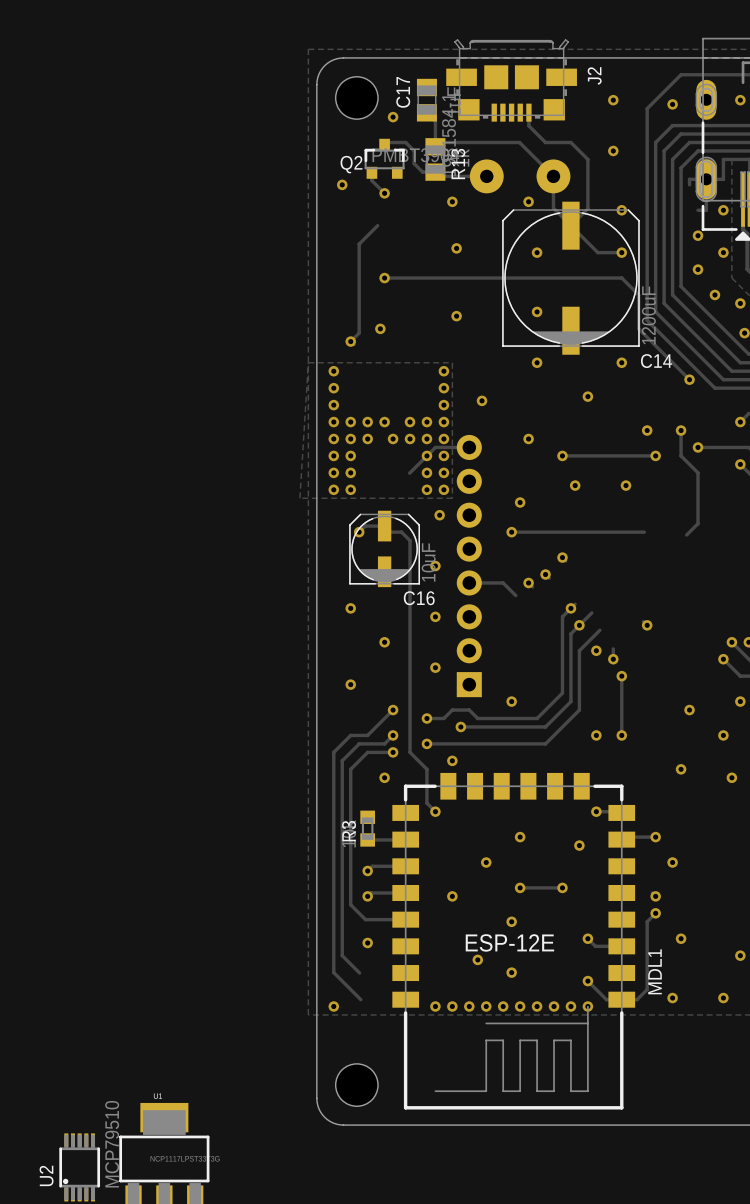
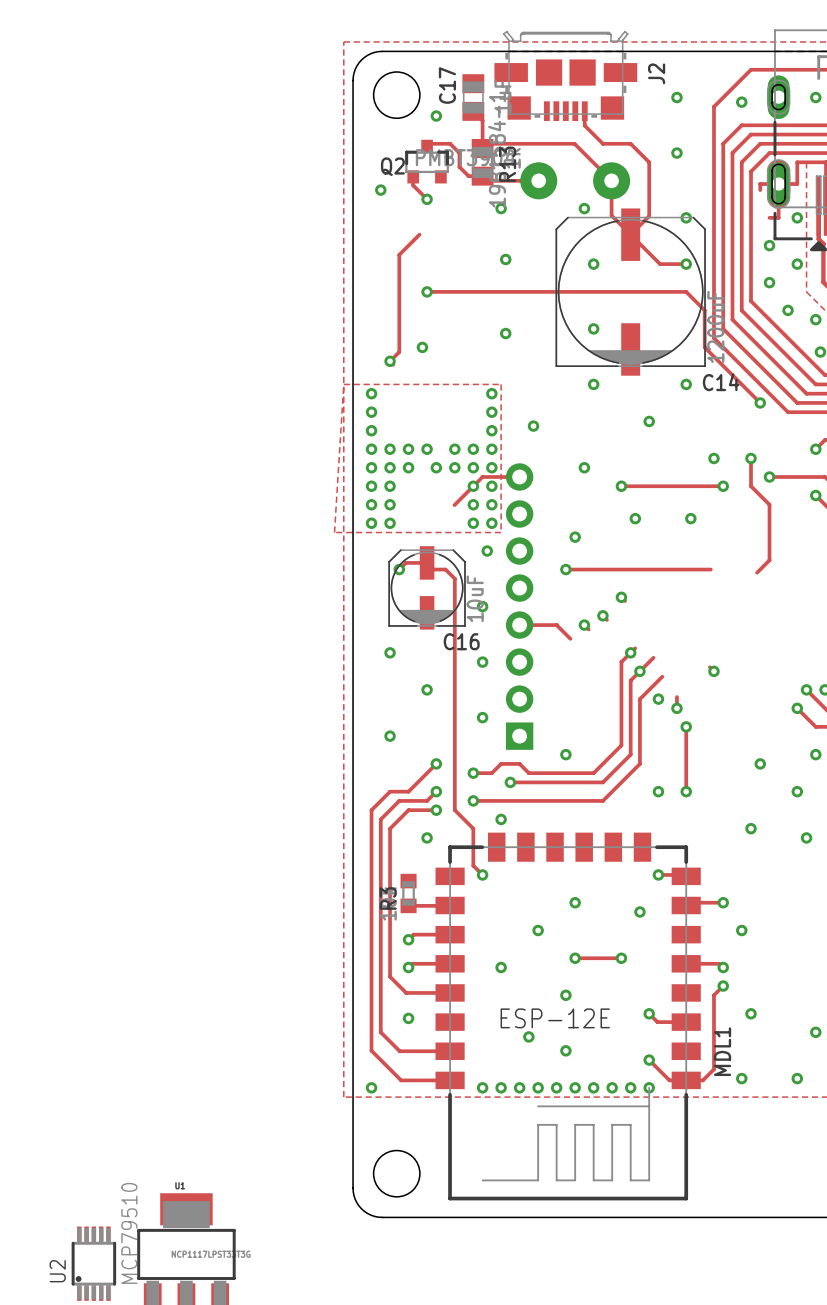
track: none -> (686, 963) (719, 963)
track: none -> (399, 1051) (450, 1051)
track: none -> (401, 1080) (450, 1080)

